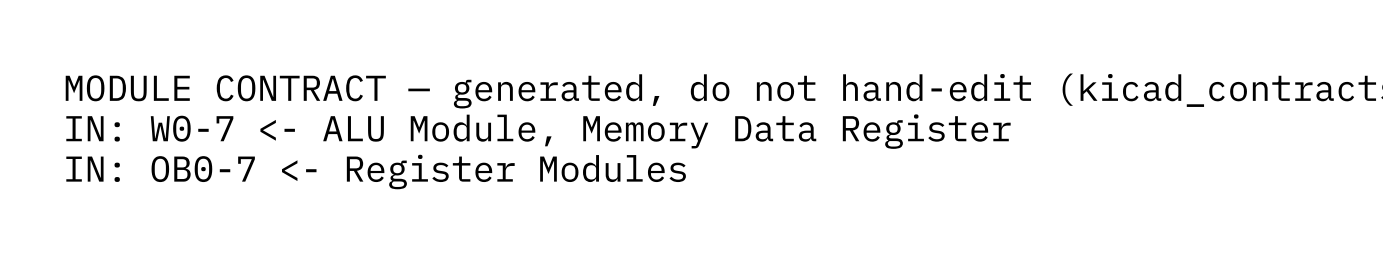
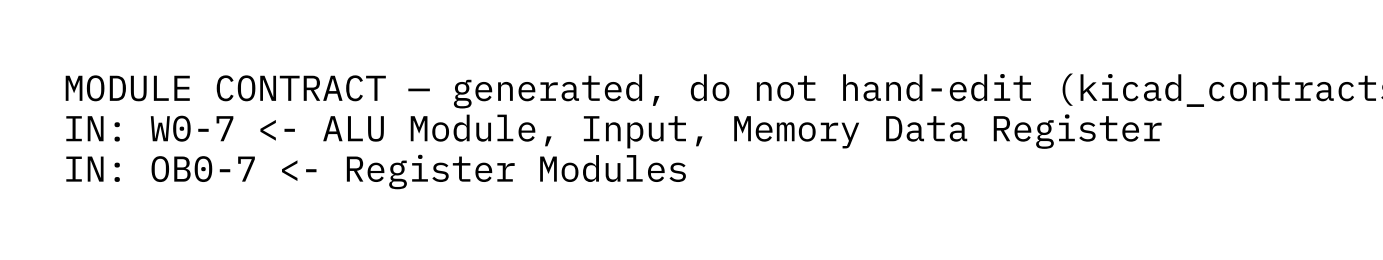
text: IN: W0-7 <- ALU Module, Memory Data Register (538, 131) -> IN: W0-7 <- ALU Module, Input, Memory Data Register (613, 131)

